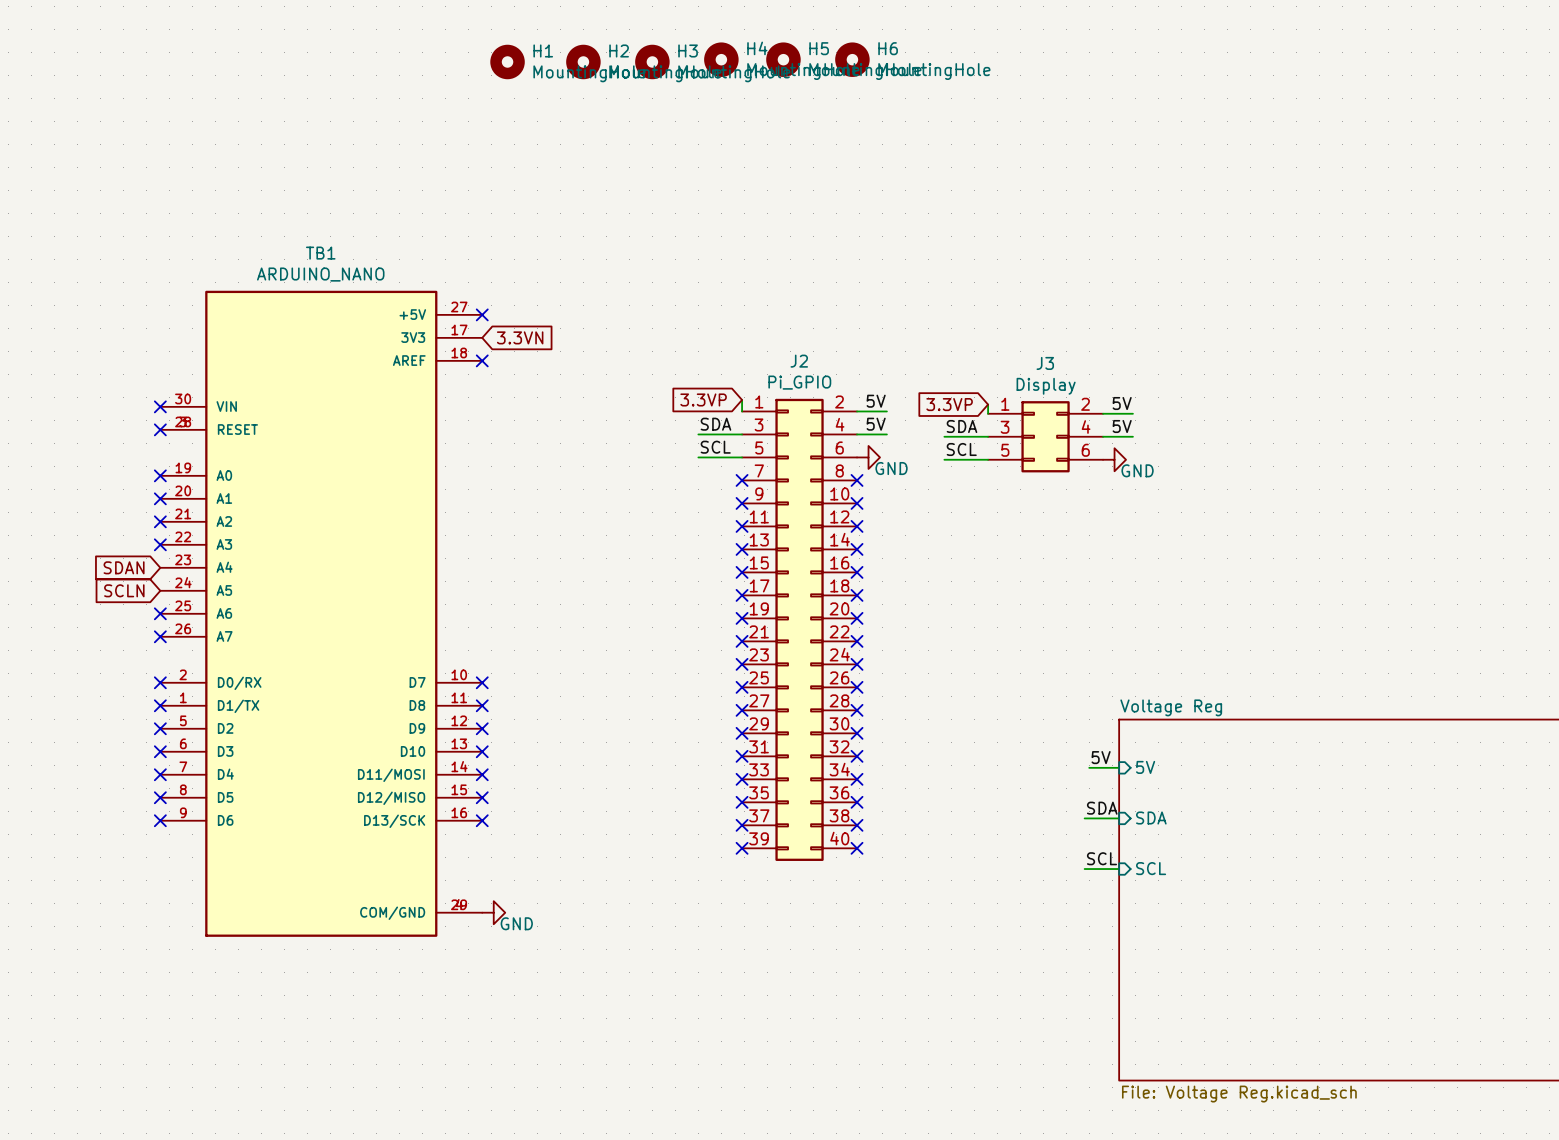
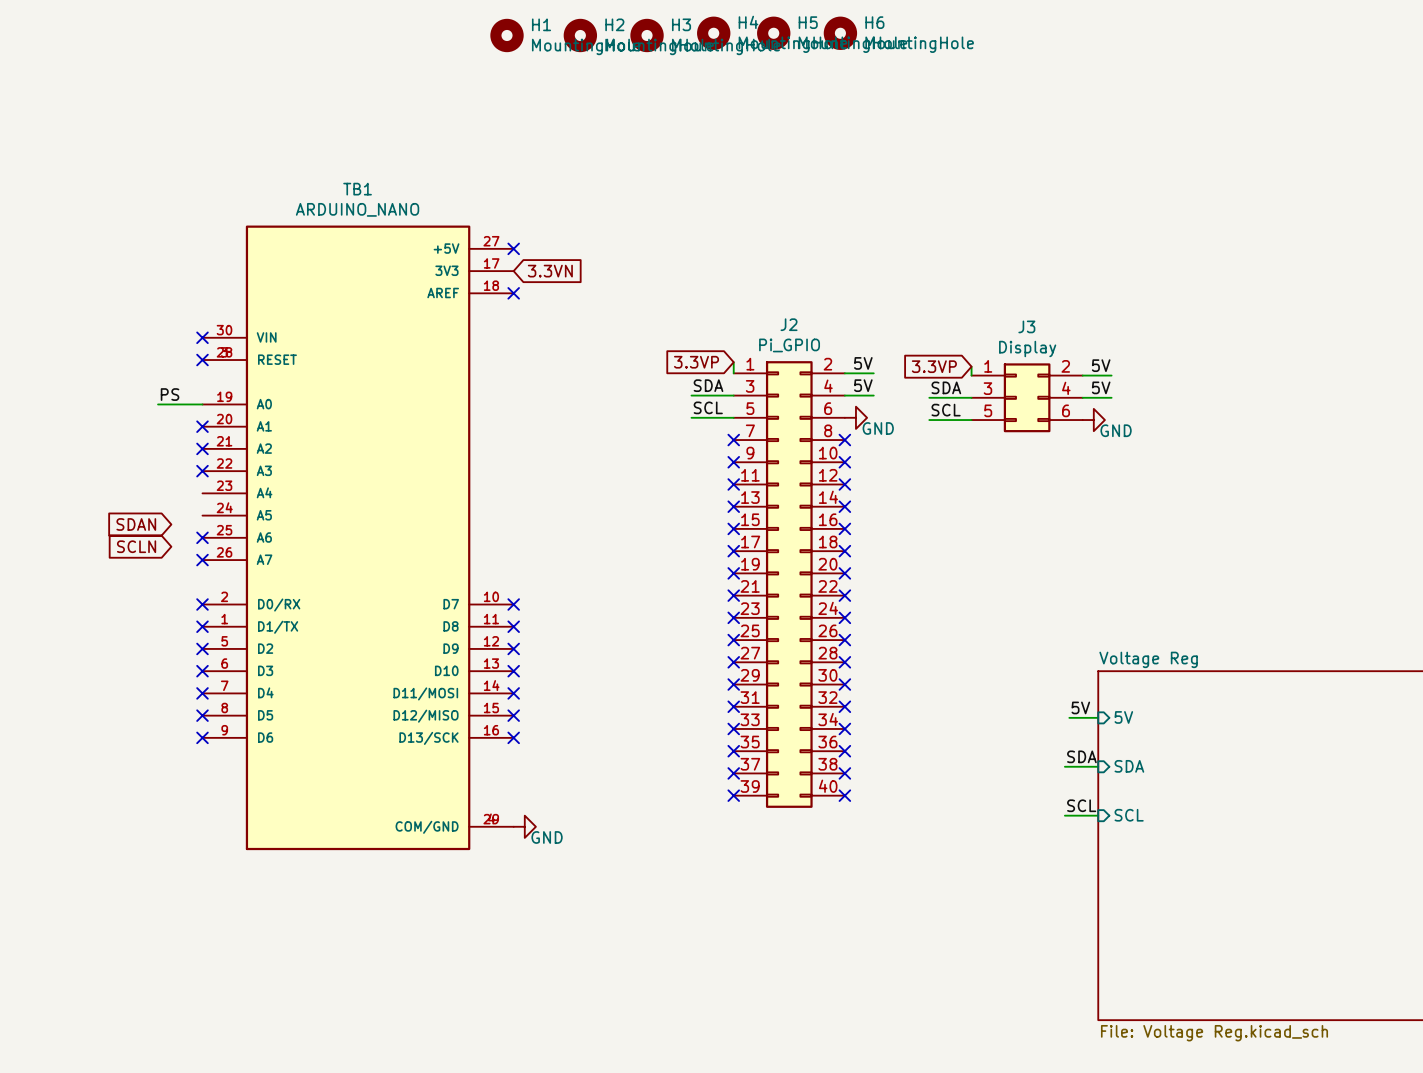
no-connect mark: none -> (513, 248)
no-connect mark: (482, 314) -> none
no-connect mark: none -> (513, 293)
global label position: 3.3VN (520, 337) -> 3.3VN (550, 271)
no-connect mark: (482, 360) -> none
no-connect mark: none -> (202, 337)
no-connect mark: none -> (202, 360)
no-connect mark: (160, 406) -> none
no-connect mark: (160, 429) -> none
label: none -> PS (170, 394)
wire: none -> (158, 404) (202, 404)
no-connect mark: none -> (202, 426)
no-connect mark: (160, 475) -> none
no-connect mark: none -> (202, 448)
no-connect mark: (160, 498) -> none
no-connect mark: none -> (202, 471)
no-connect mark: (160, 521) -> none
no-connect mark: (160, 544) -> none
no-connect mark: none -> (202, 537)
no-connect mark: none -> (202, 560)
no-connect mark: (160, 613) -> none
TB1 position: (321, 613) -> (358, 537)
no-connect mark: (160, 636) -> none
no-connect mark: none -> (202, 604)
no-connect mark: none -> (513, 604)
no-connect mark: none -> (202, 626)
no-connect mark: none -> (513, 626)
no-connect mark: (160, 682) -> none
no-connect mark: (482, 682) -> none
no-connect mark: none -> (202, 648)
no-connect mark: none -> (513, 648)
no-connect mark: (160, 705) -> none
no-connect mark: (482, 705) -> none
no-connect mark: none -> (202, 671)
no-connect mark: none -> (513, 671)
no-connect mark: (160, 728) -> none
no-connect mark: (482, 728) -> none
no-connect mark: none -> (202, 693)
no-connect mark: none -> (513, 693)
no-connect mark: (160, 751) -> none
no-connect mark: (482, 751) -> none
no-connect mark: none -> (202, 715)
no-connect mark: none -> (513, 715)
no-connect mark: (160, 774) -> none
no-connect mark: (482, 774) -> none
no-connect mark: none -> (202, 737)
no-connect mark: none -> (513, 737)
no-connect mark: (160, 797) -> none
no-connect mark: (482, 797) -> none
no-connect mark: (160, 820) -> none
no-connect mark: (482, 820) -> none
power symbol position: GND (493, 912) -> GND (524, 826)

